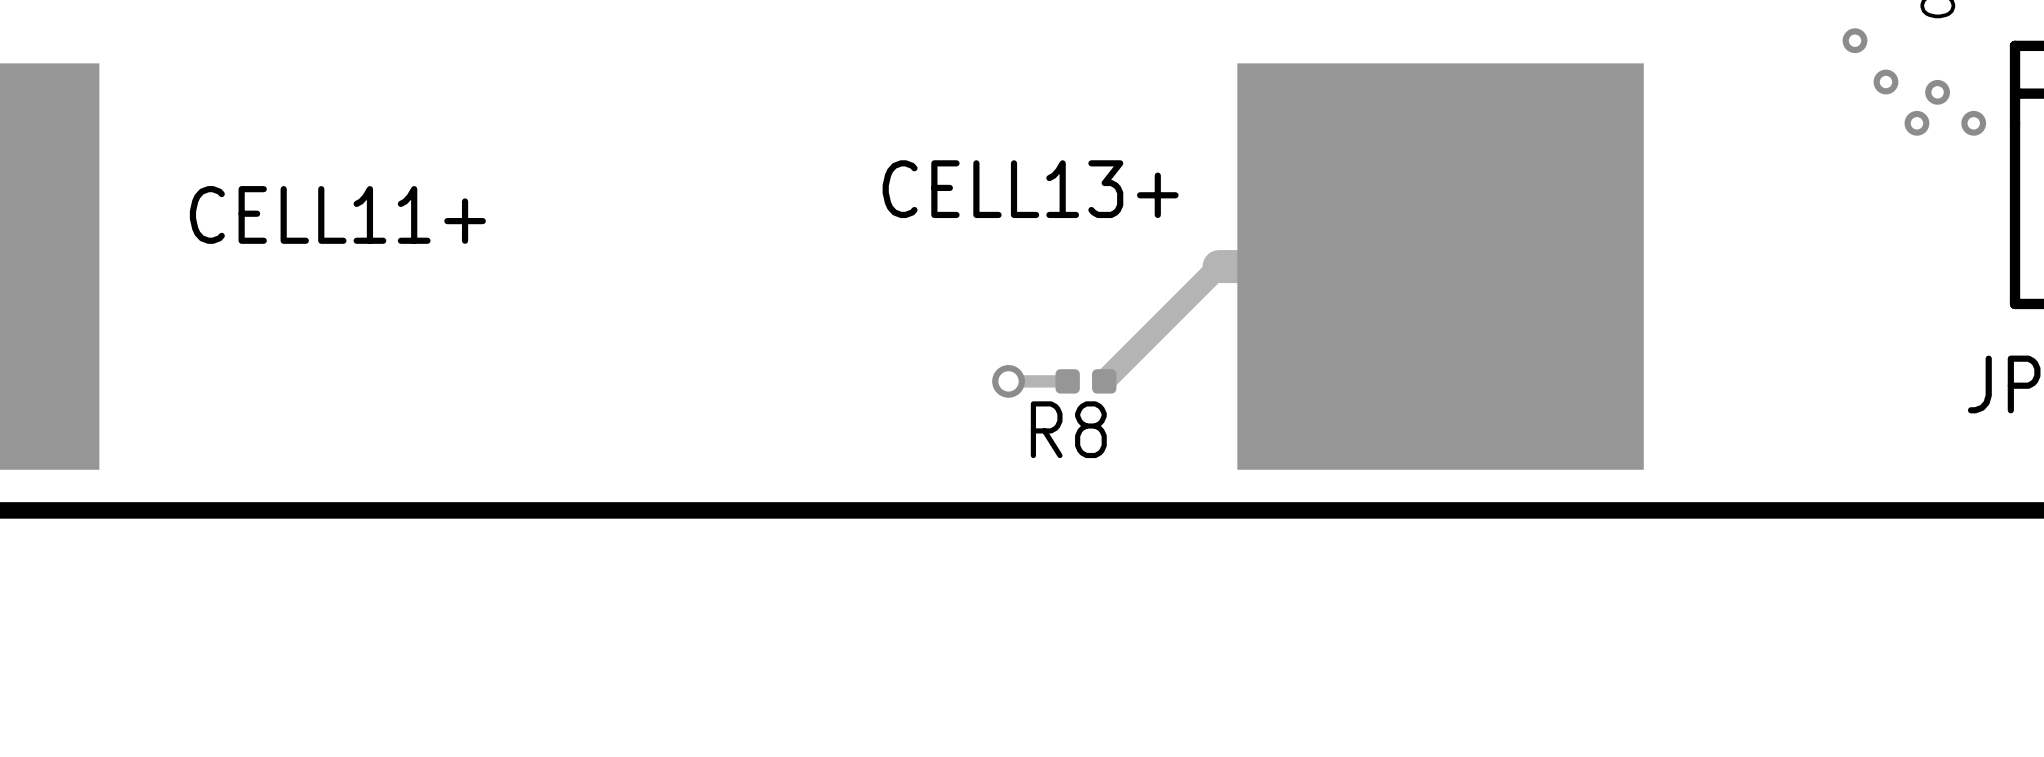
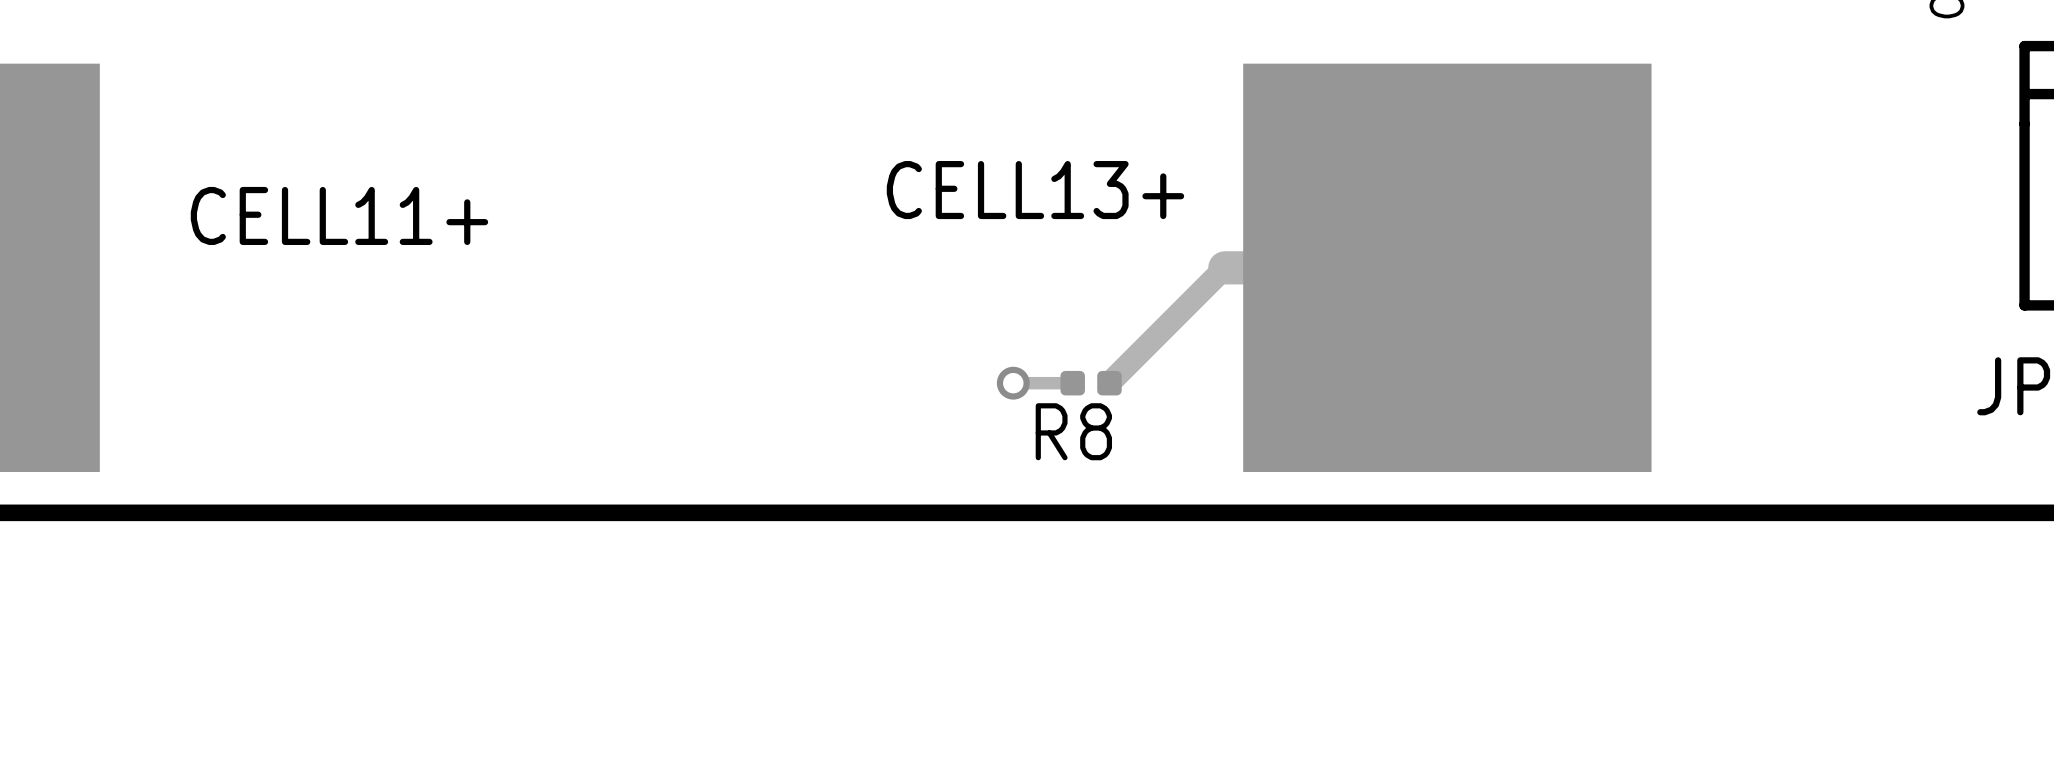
via: (1855, 40) -> none
via: (1885, 82) -> none
via: (1937, 92) -> none
via: (1916, 123) -> none
via: (1973, 123) -> none

